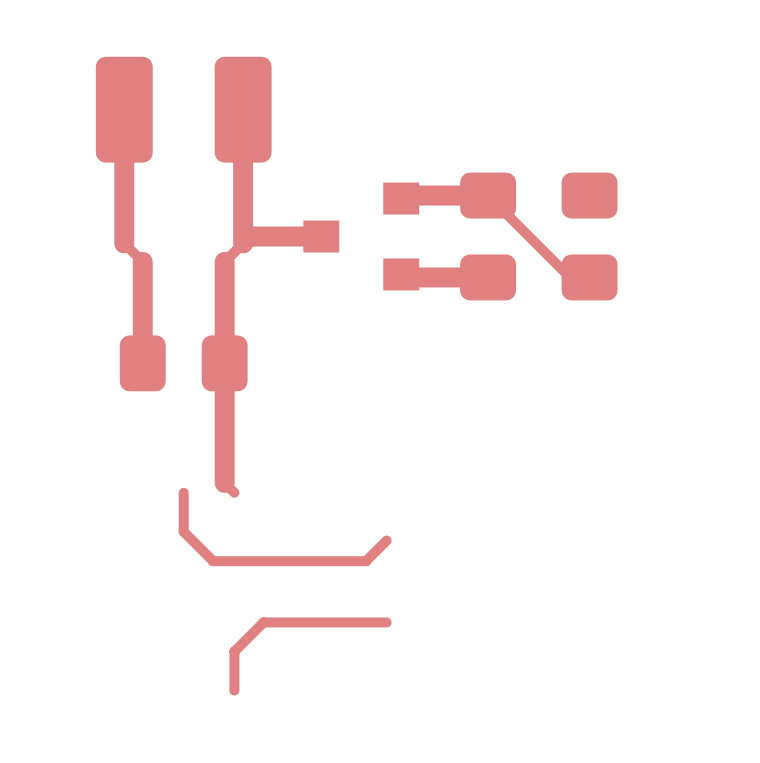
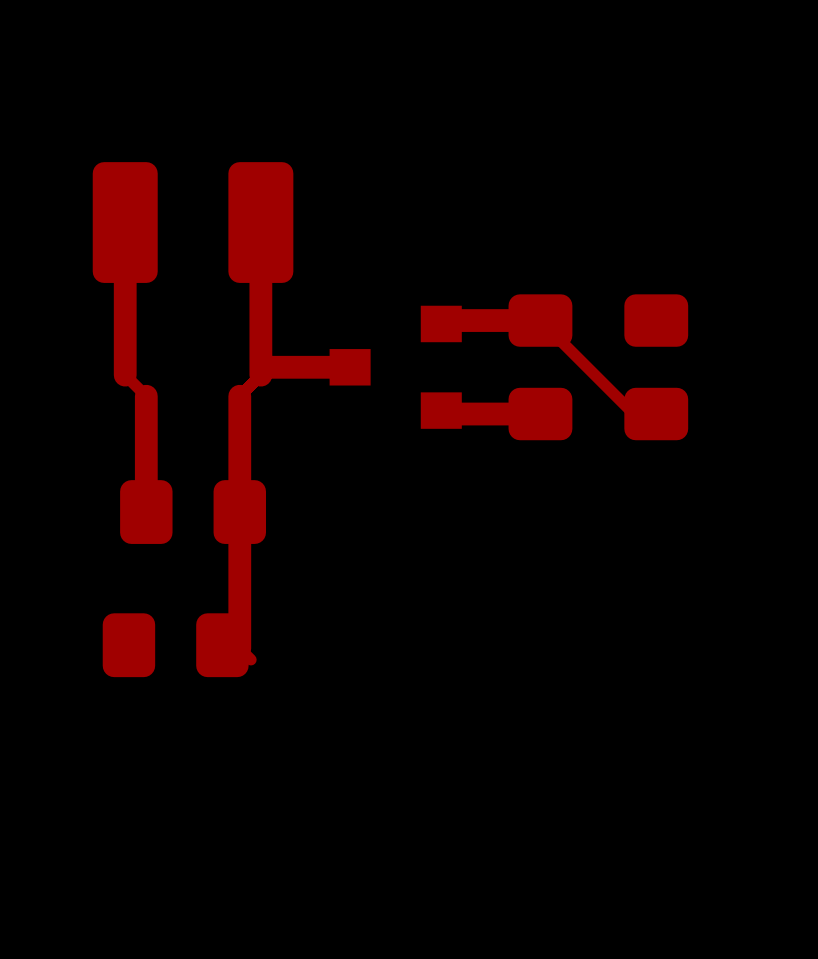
part: none -> (175, 645)
top track: (183, 492) (183, 531) (213, 561) (365, 561) (386, 540) -> none
top track: (386, 622) (263, 622) (234, 651) (234, 690) -> none

